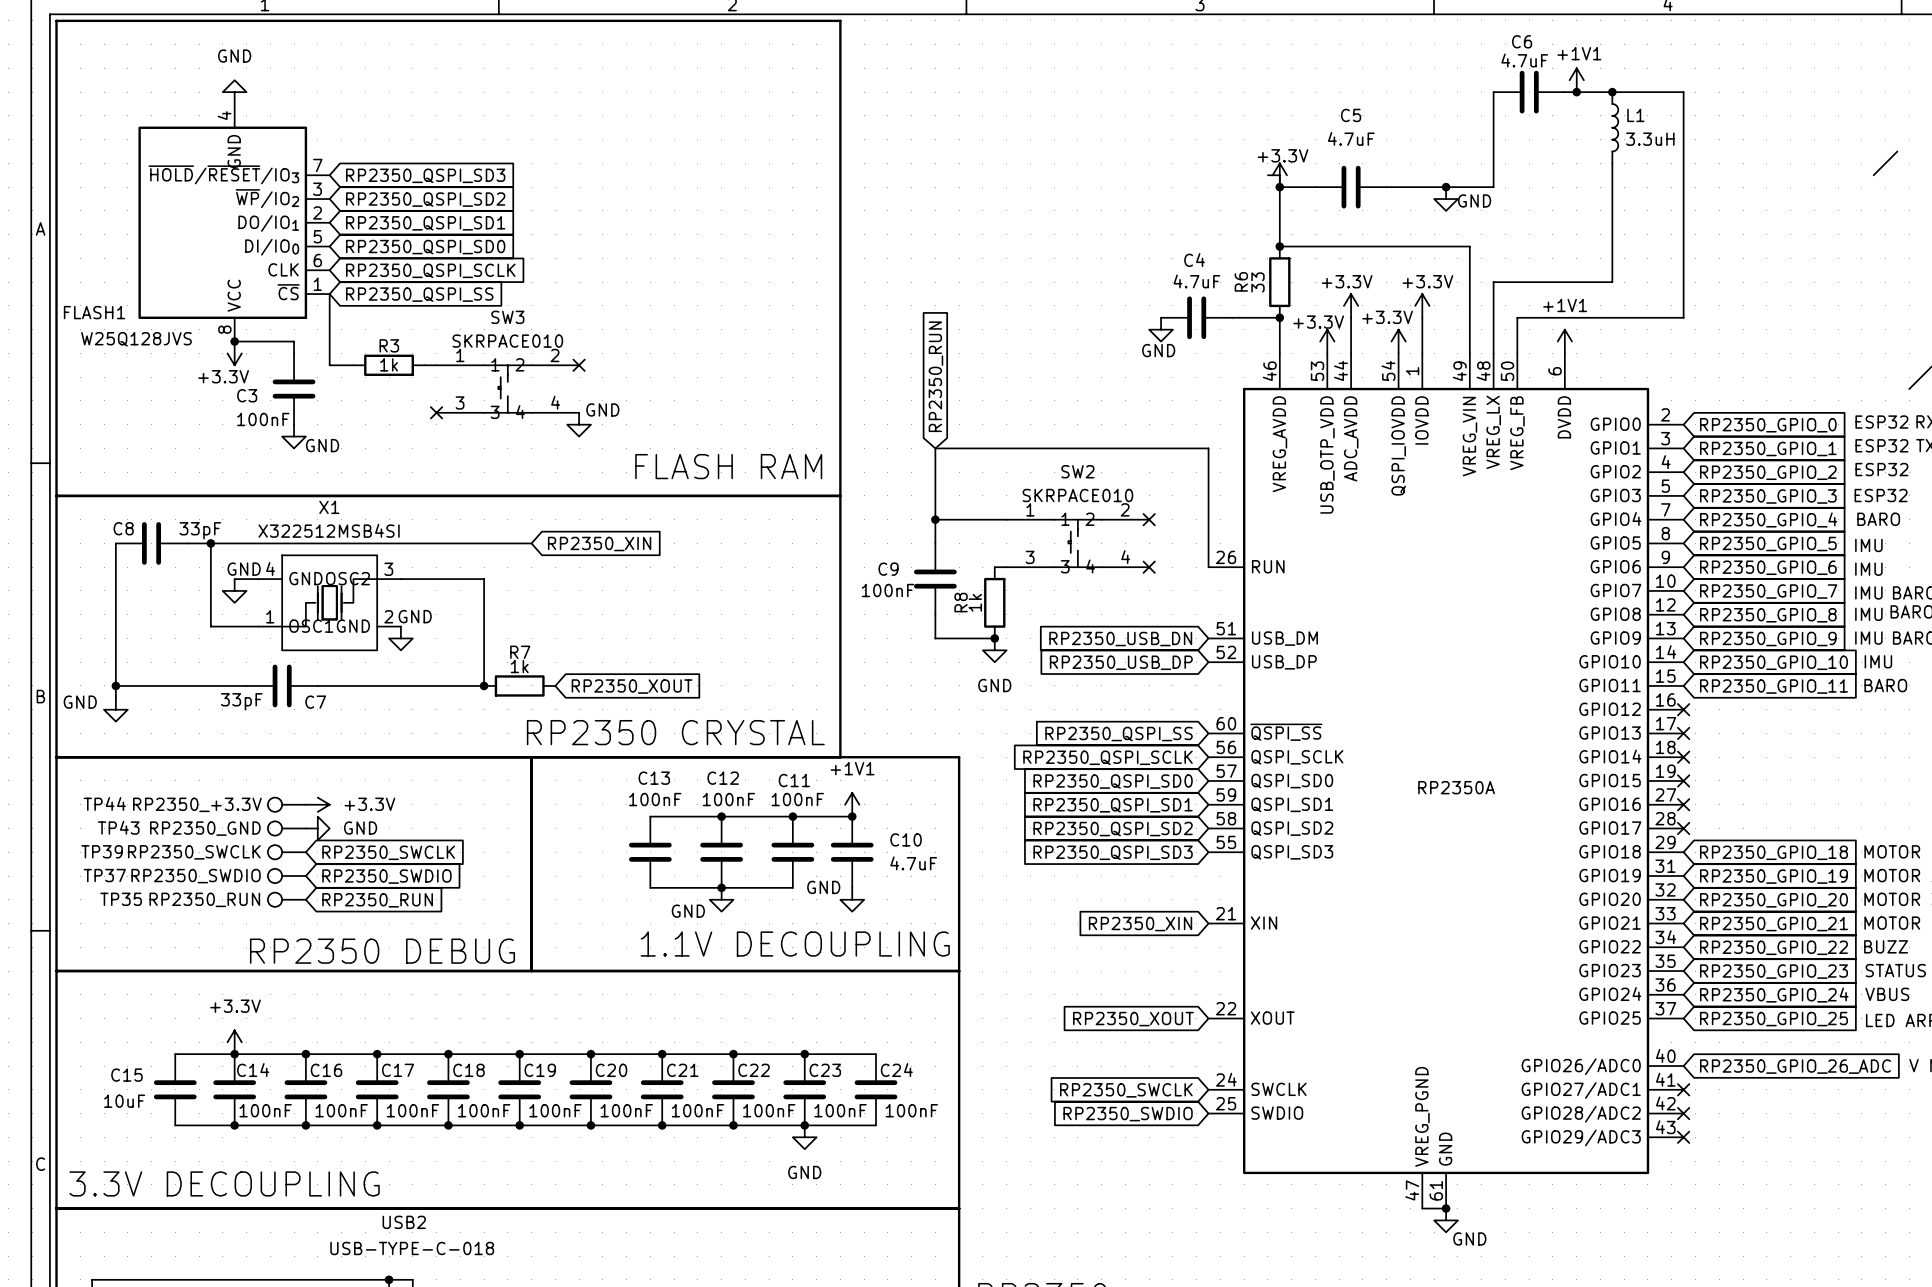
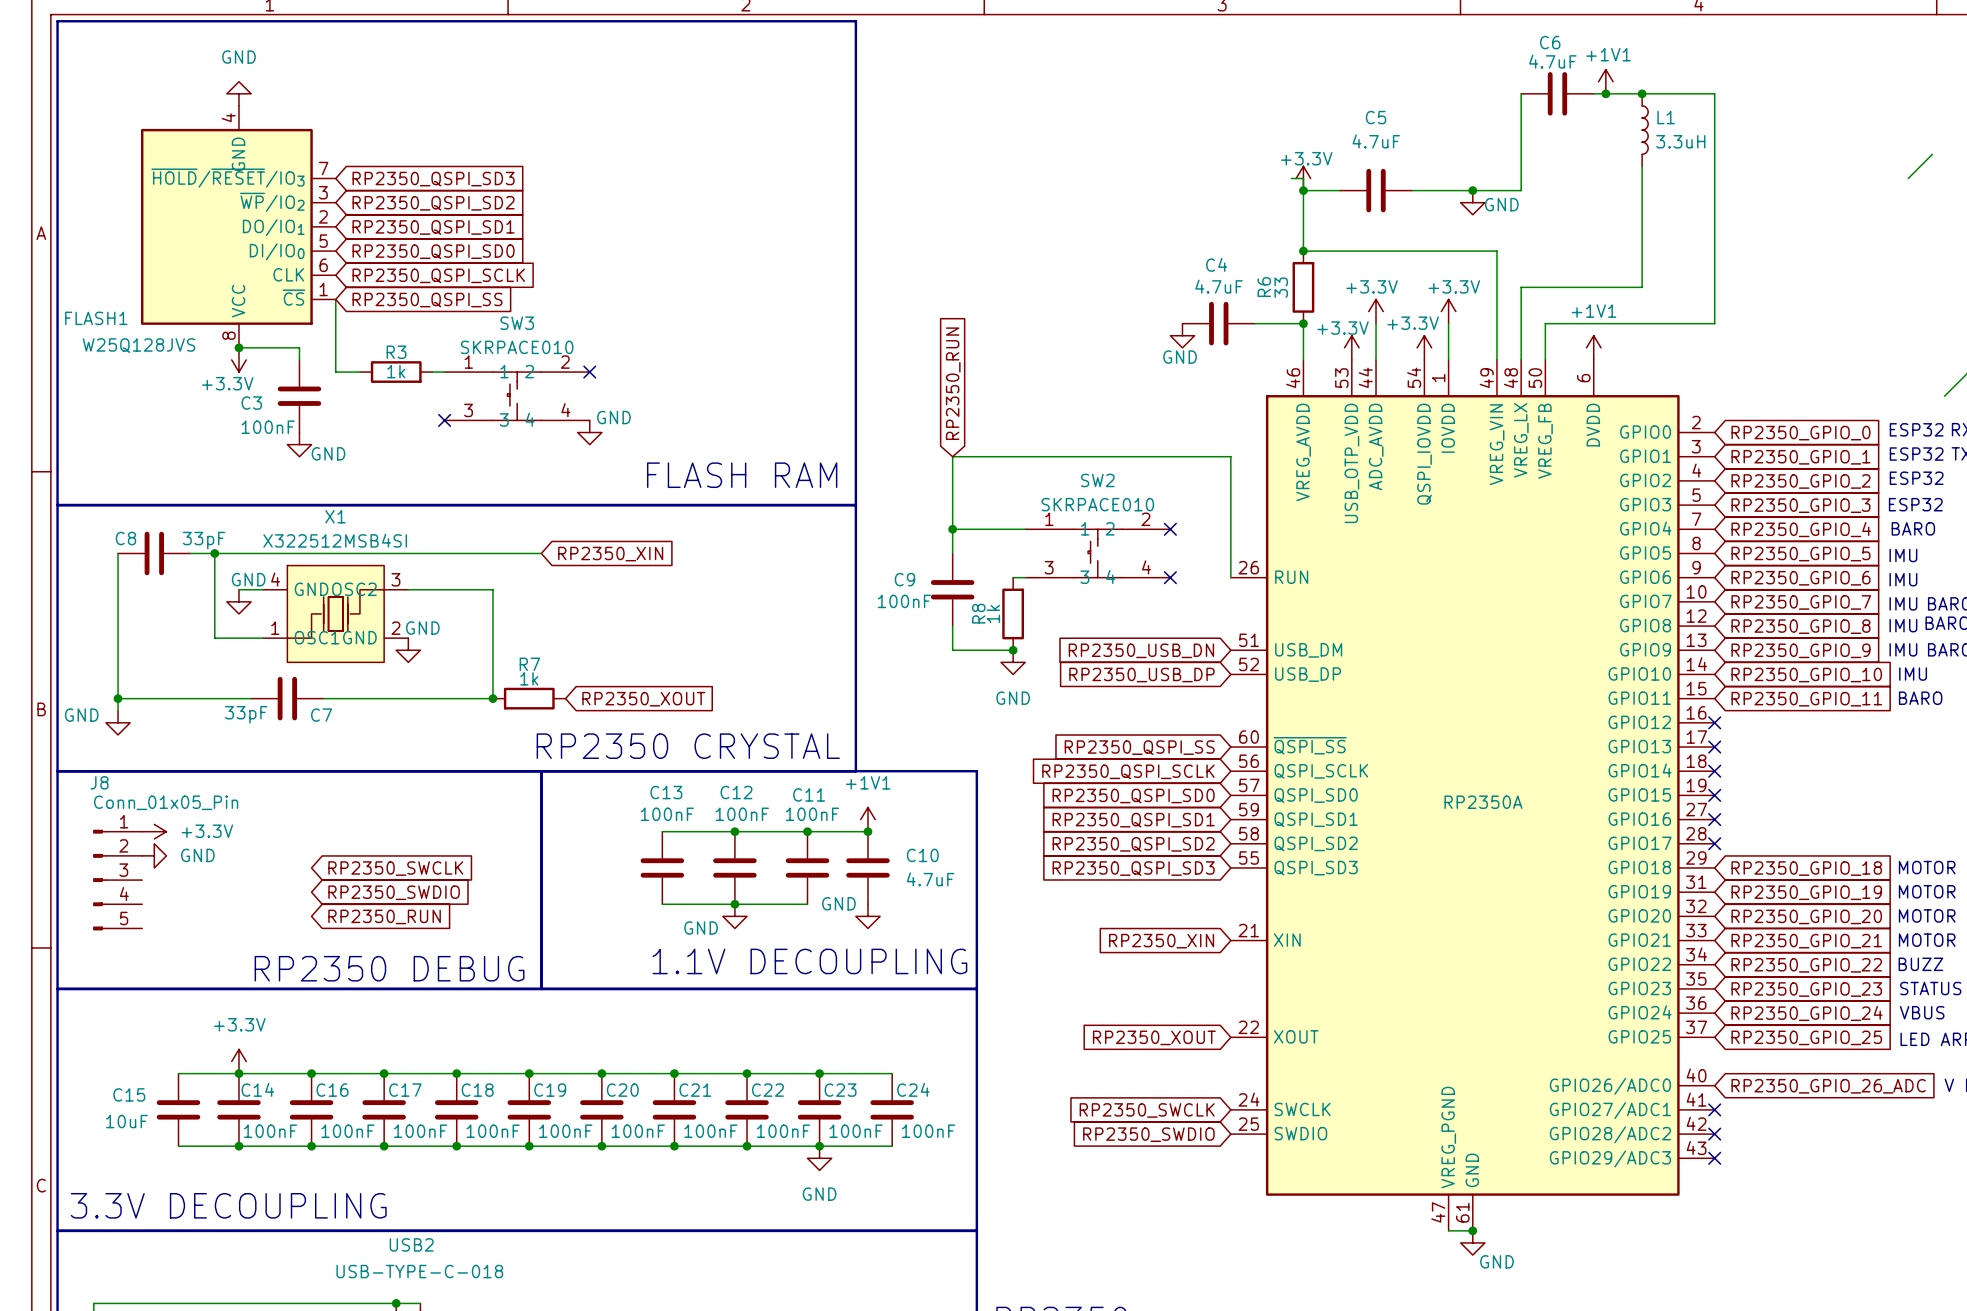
TP44: RP2350_+3.3V (286, 804) -> none
power symbol position: +3.3V (317, 804) -> +3.3V (154, 831)
TP43: RP2350_GND (286, 828) -> none
power symbol position: GND (317, 828) -> GND (154, 855)
TP39: RP2350_SWCLK (286, 852) -> none
J8: none -> Conn_01x05_Pin (117, 880)
TP37: RP2350_SWDIO (286, 876) -> none
TP35: RP2350_RUN (286, 899) -> none

